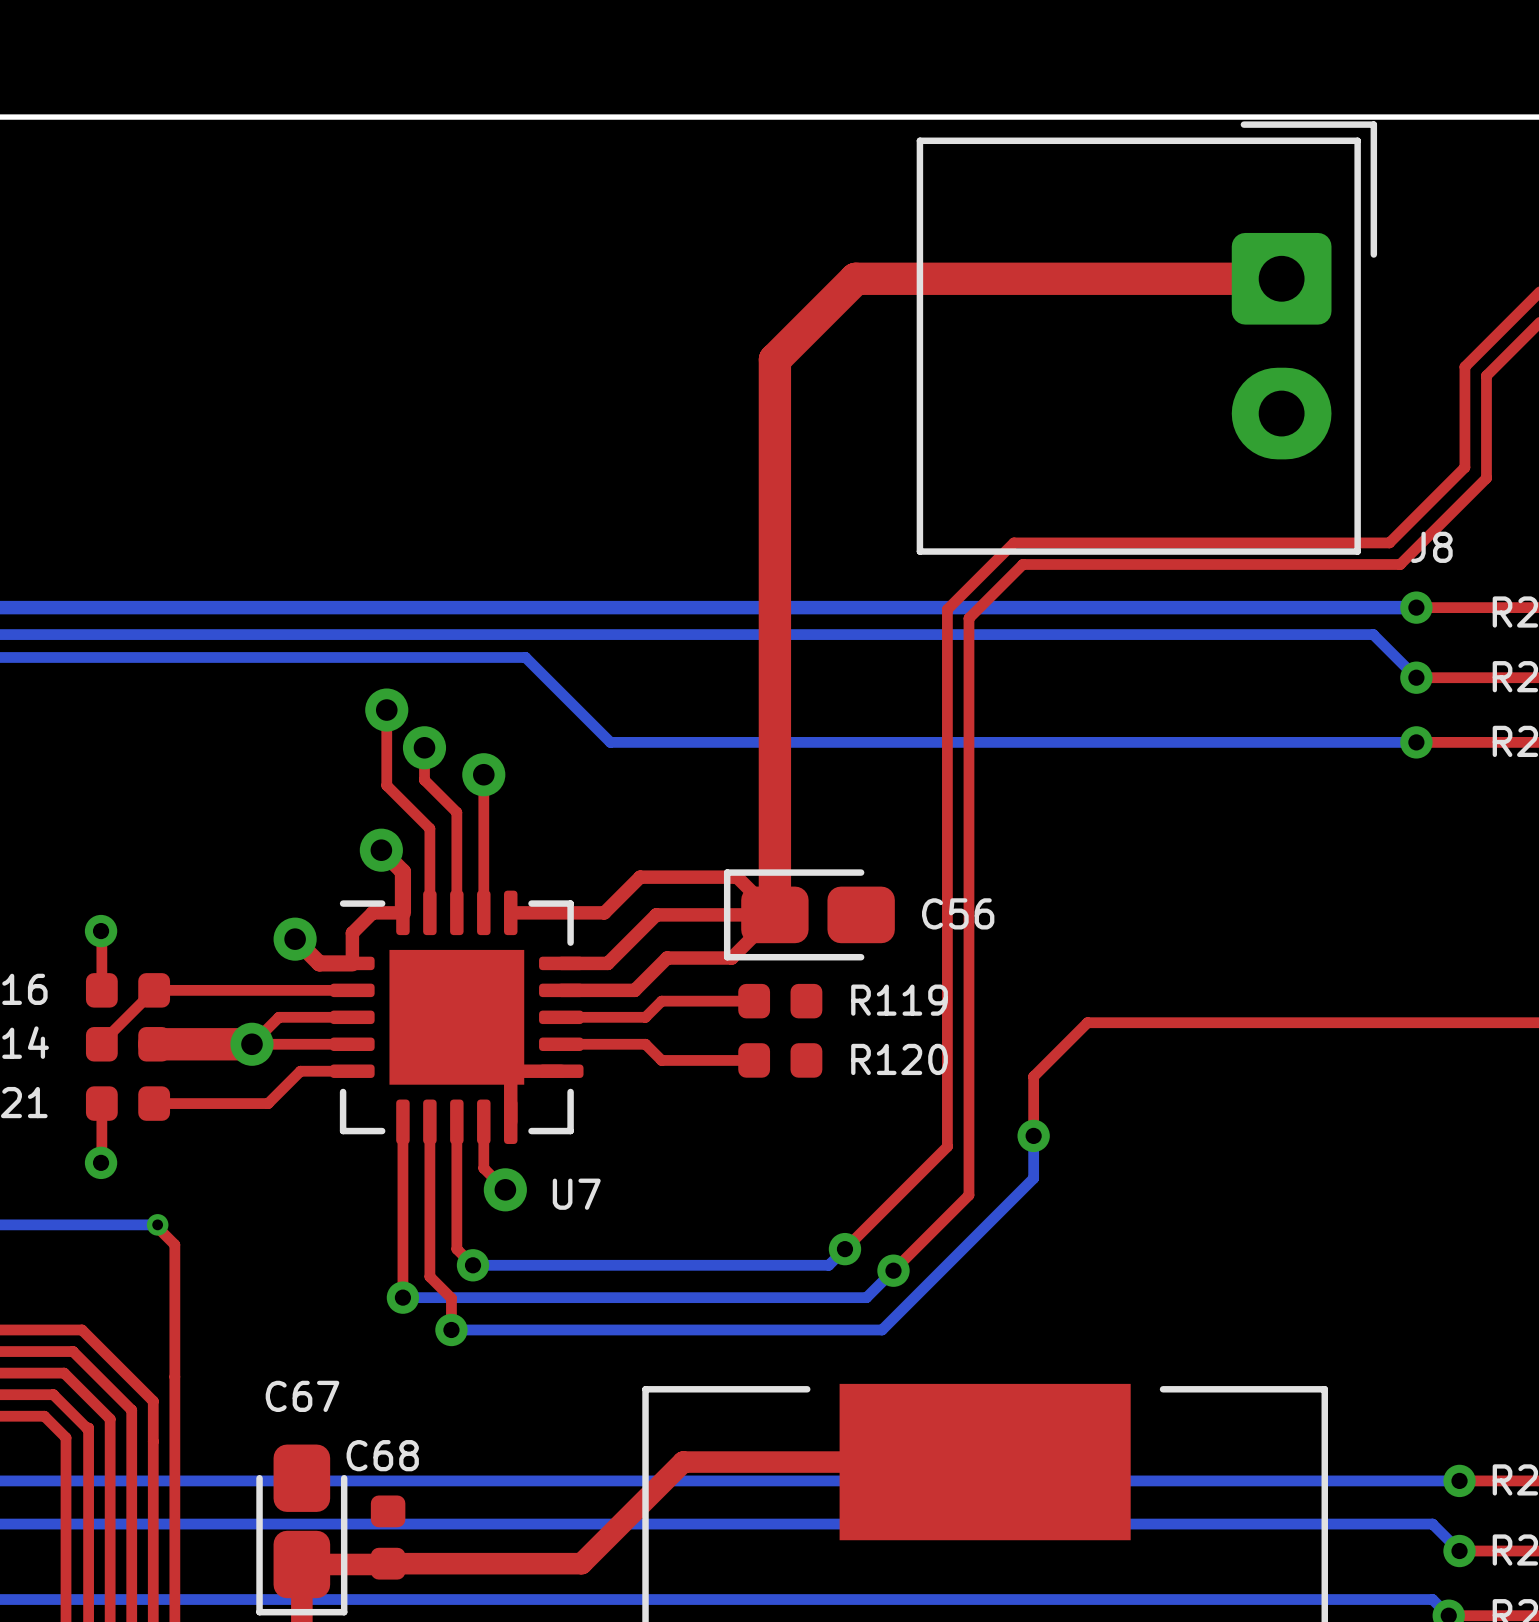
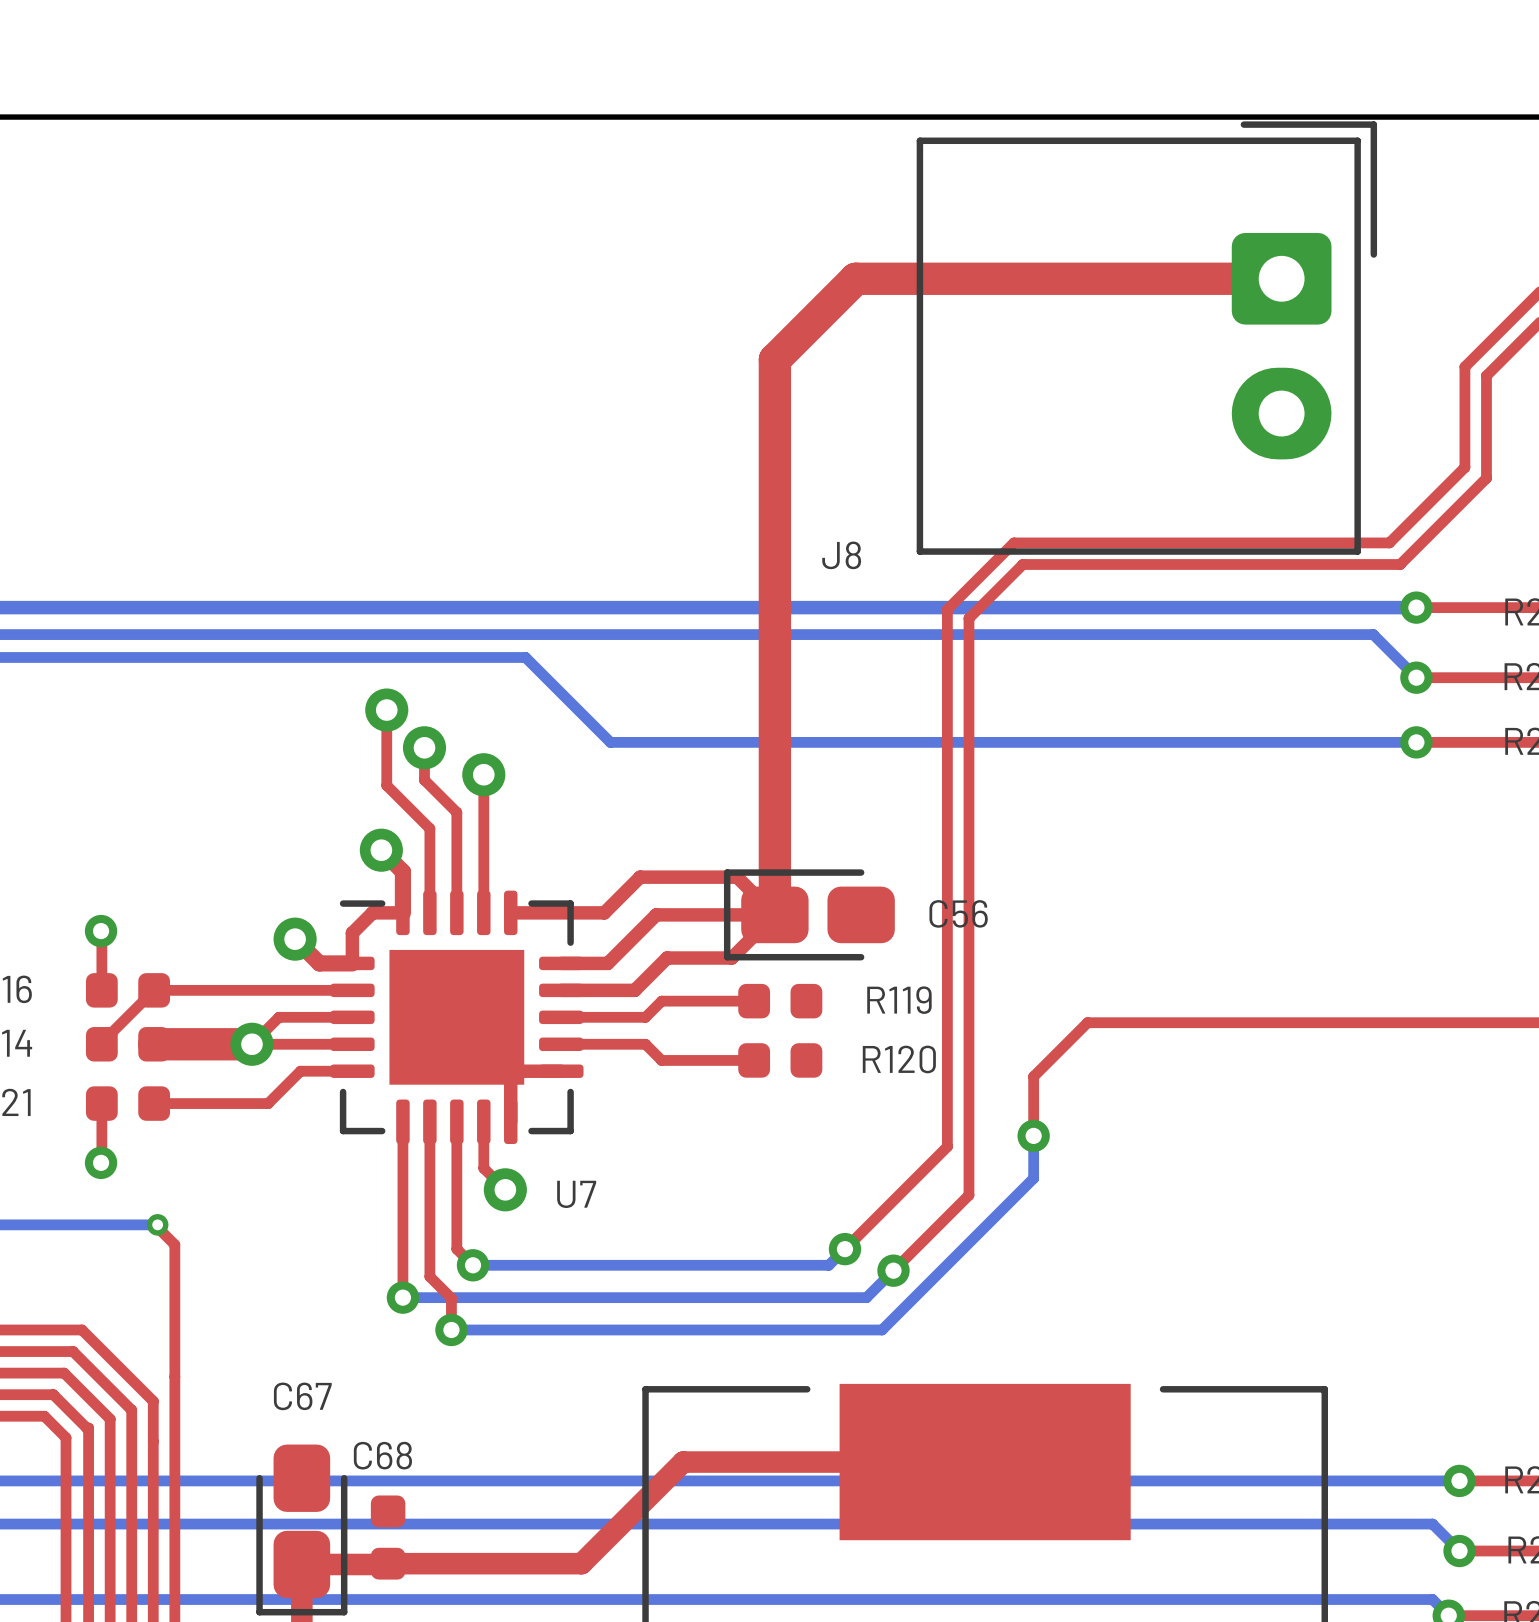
J8 name position: J8 (1431, 547) -> J8 (841, 555)

